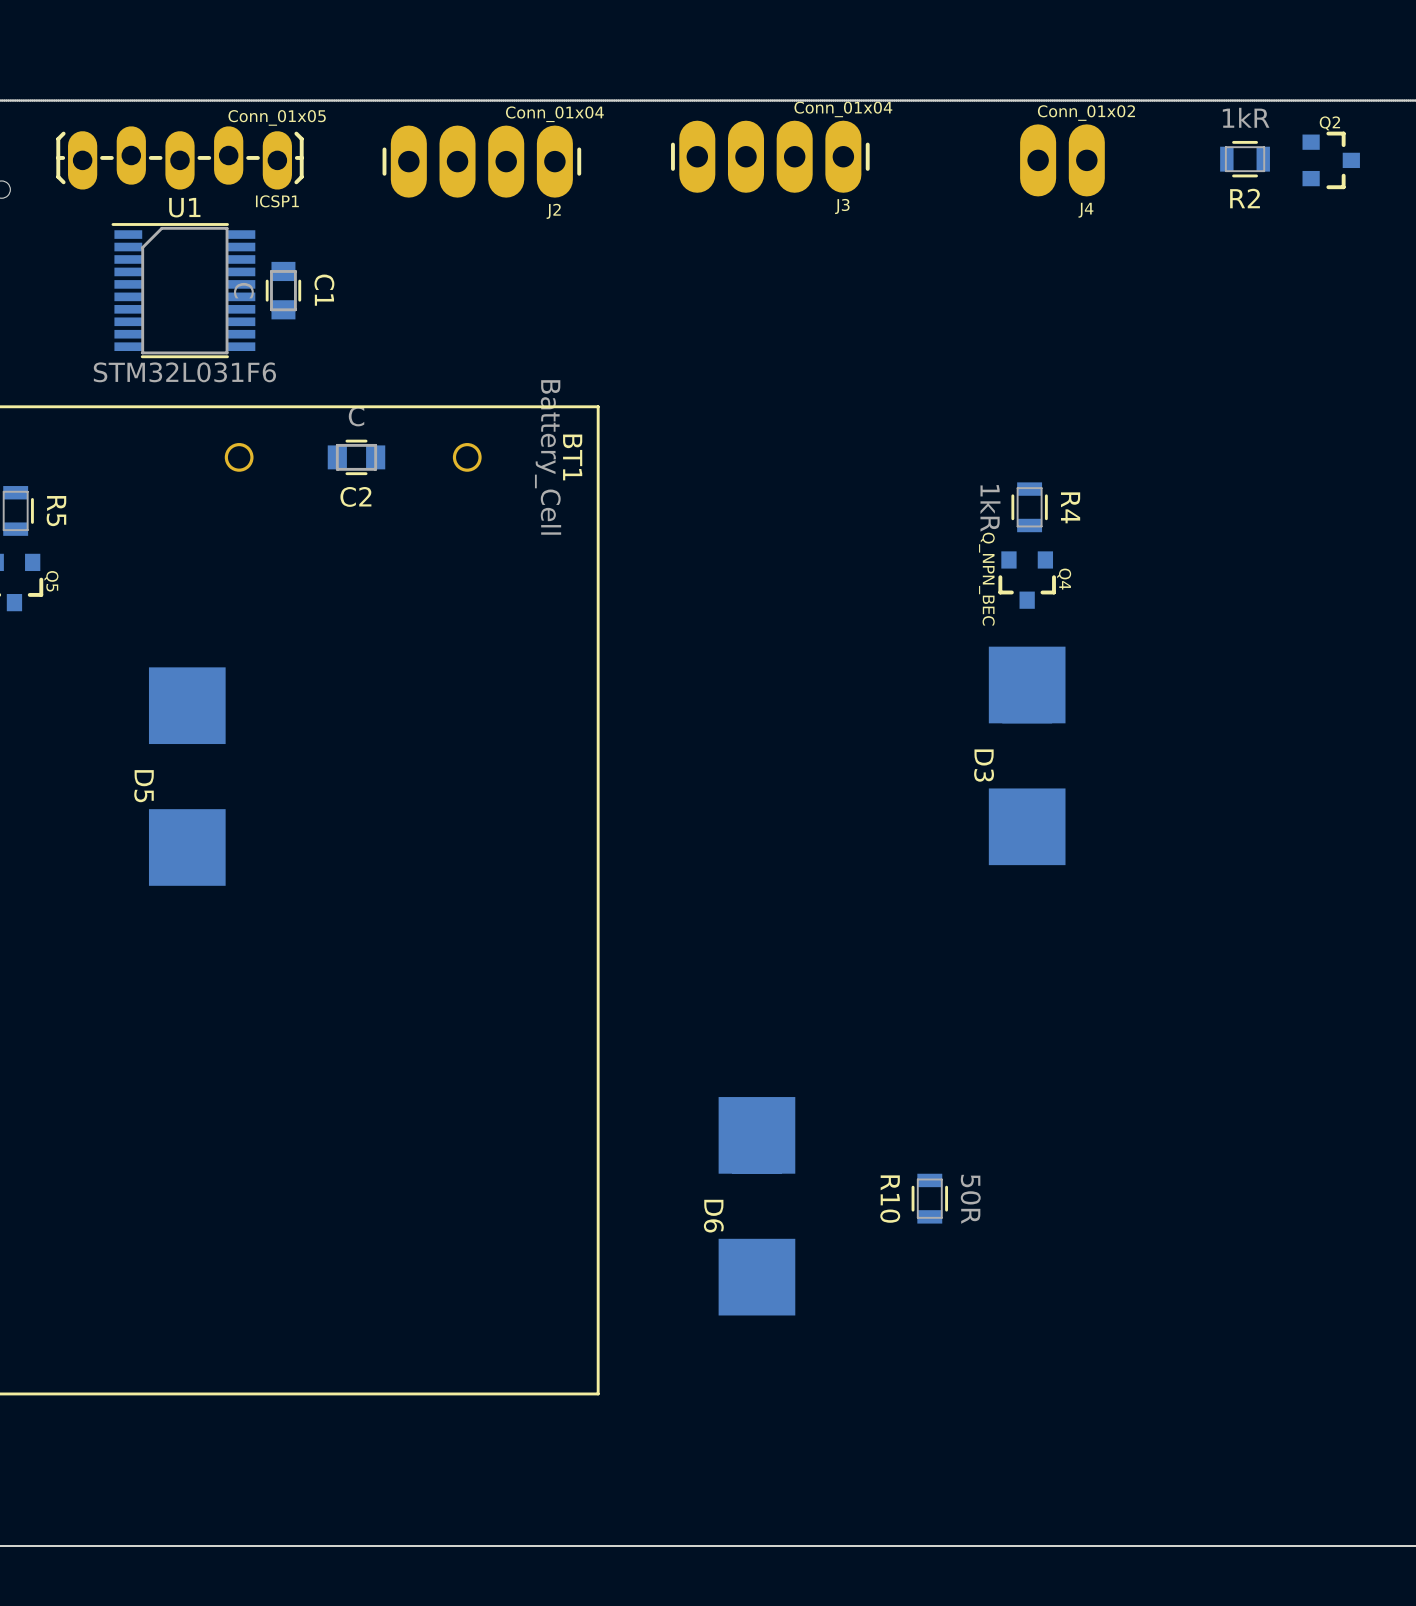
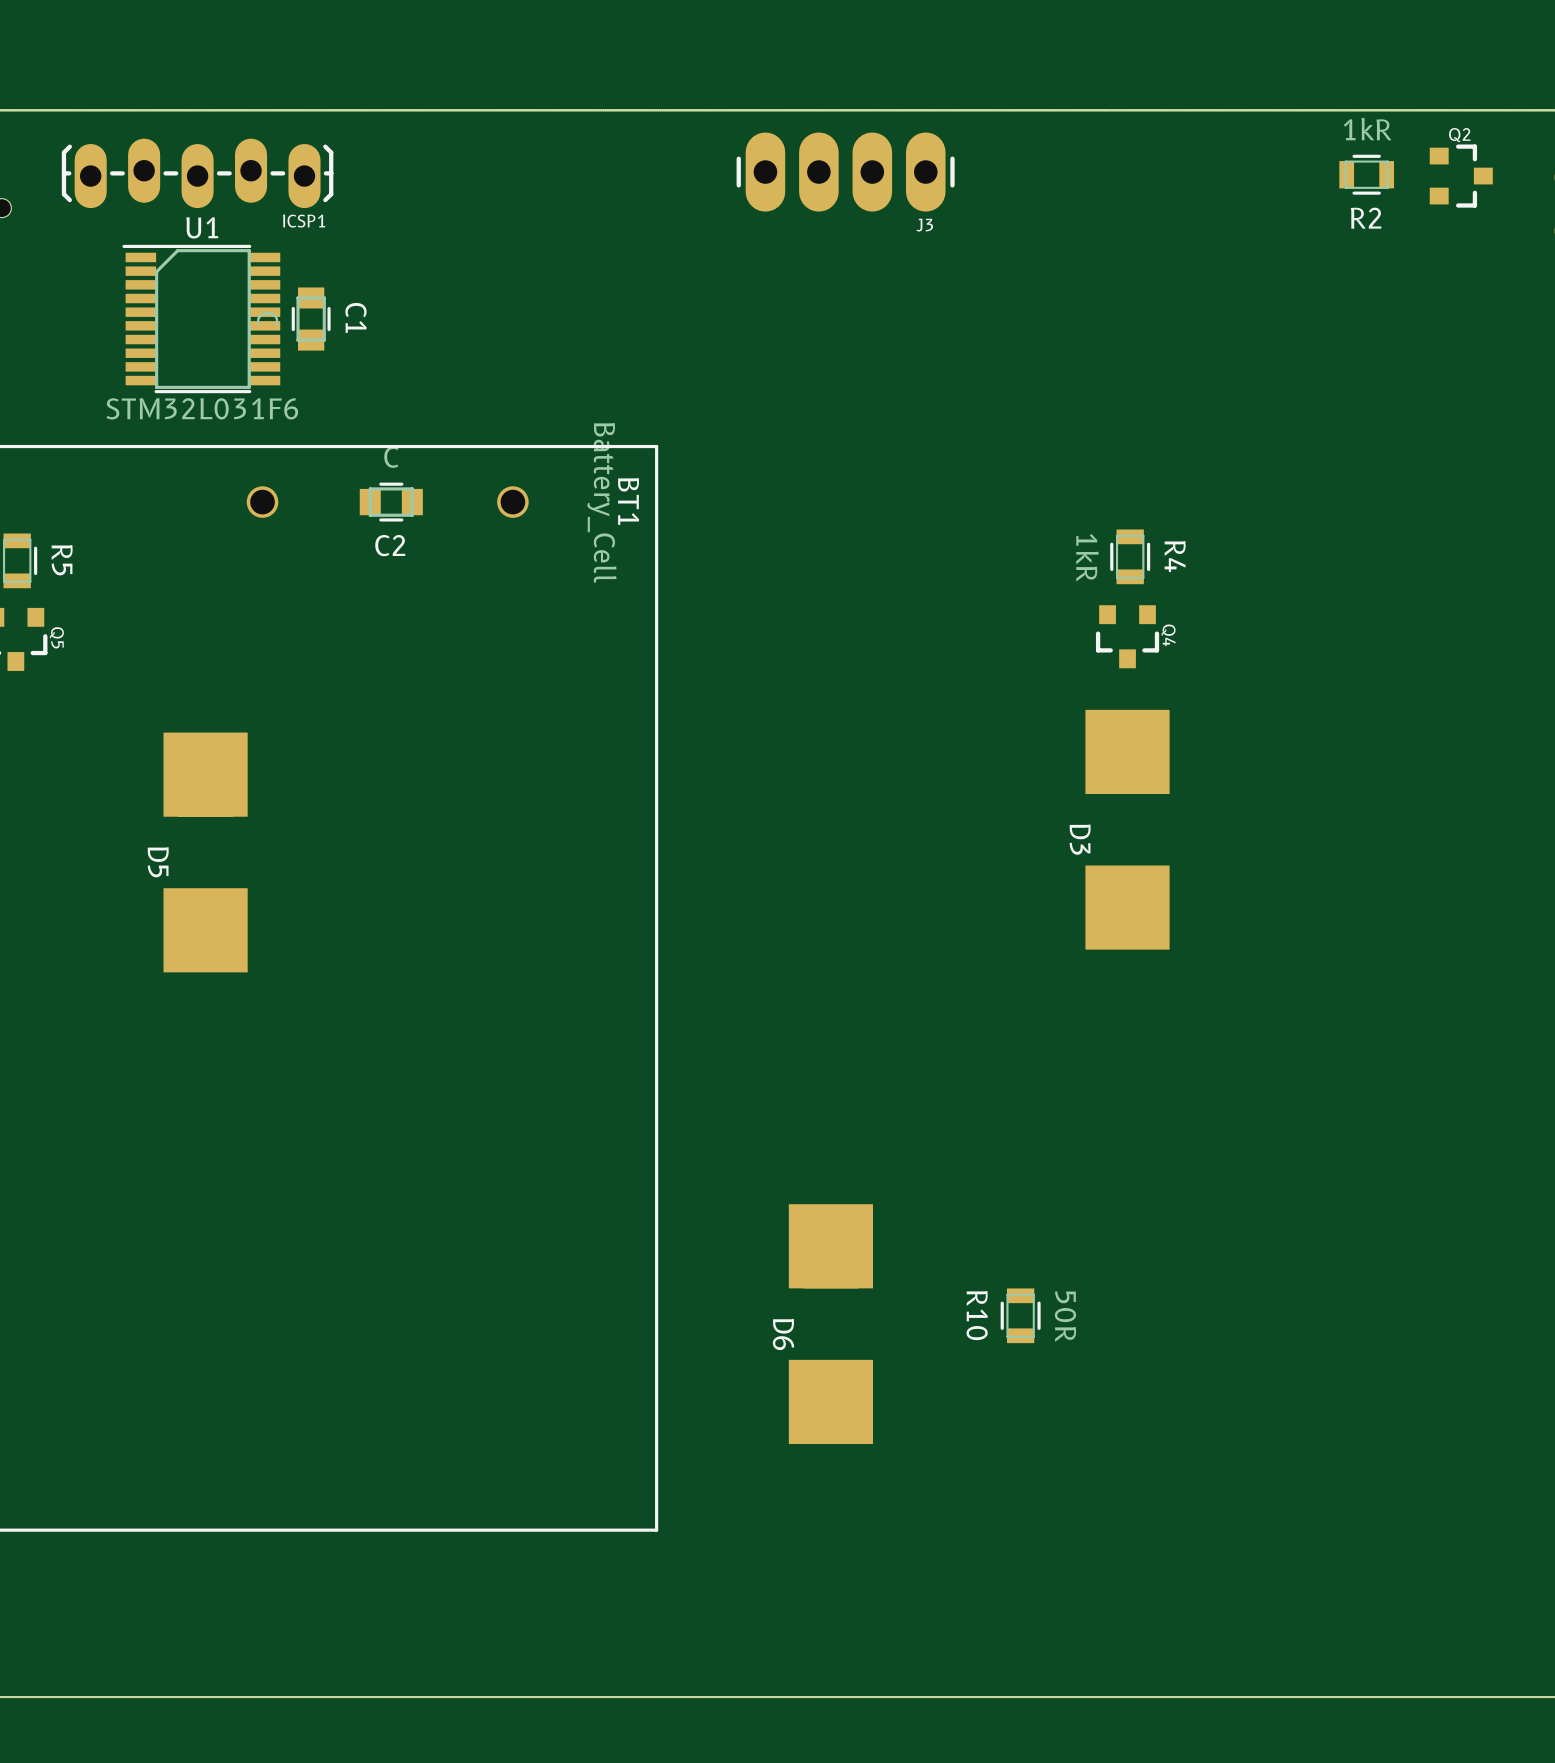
J3 value: Conn_01x04 (843, 109) -> none
ICSP1 value: Conn_01x05 (277, 117) -> none
J4: Conn_01x02 (1062, 160) -> none
J2: Conn_01x04 (481, 161) -> none
Q4 value: Q_NPN_BEC (986, 579) -> none

